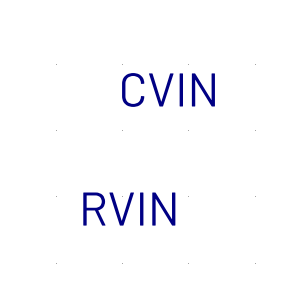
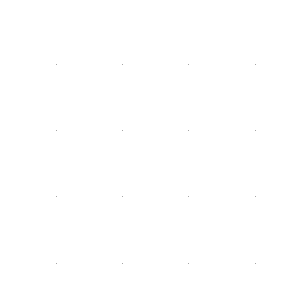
text: CVIN (168, 89) -> none
text: RVIN (129, 209) -> none

